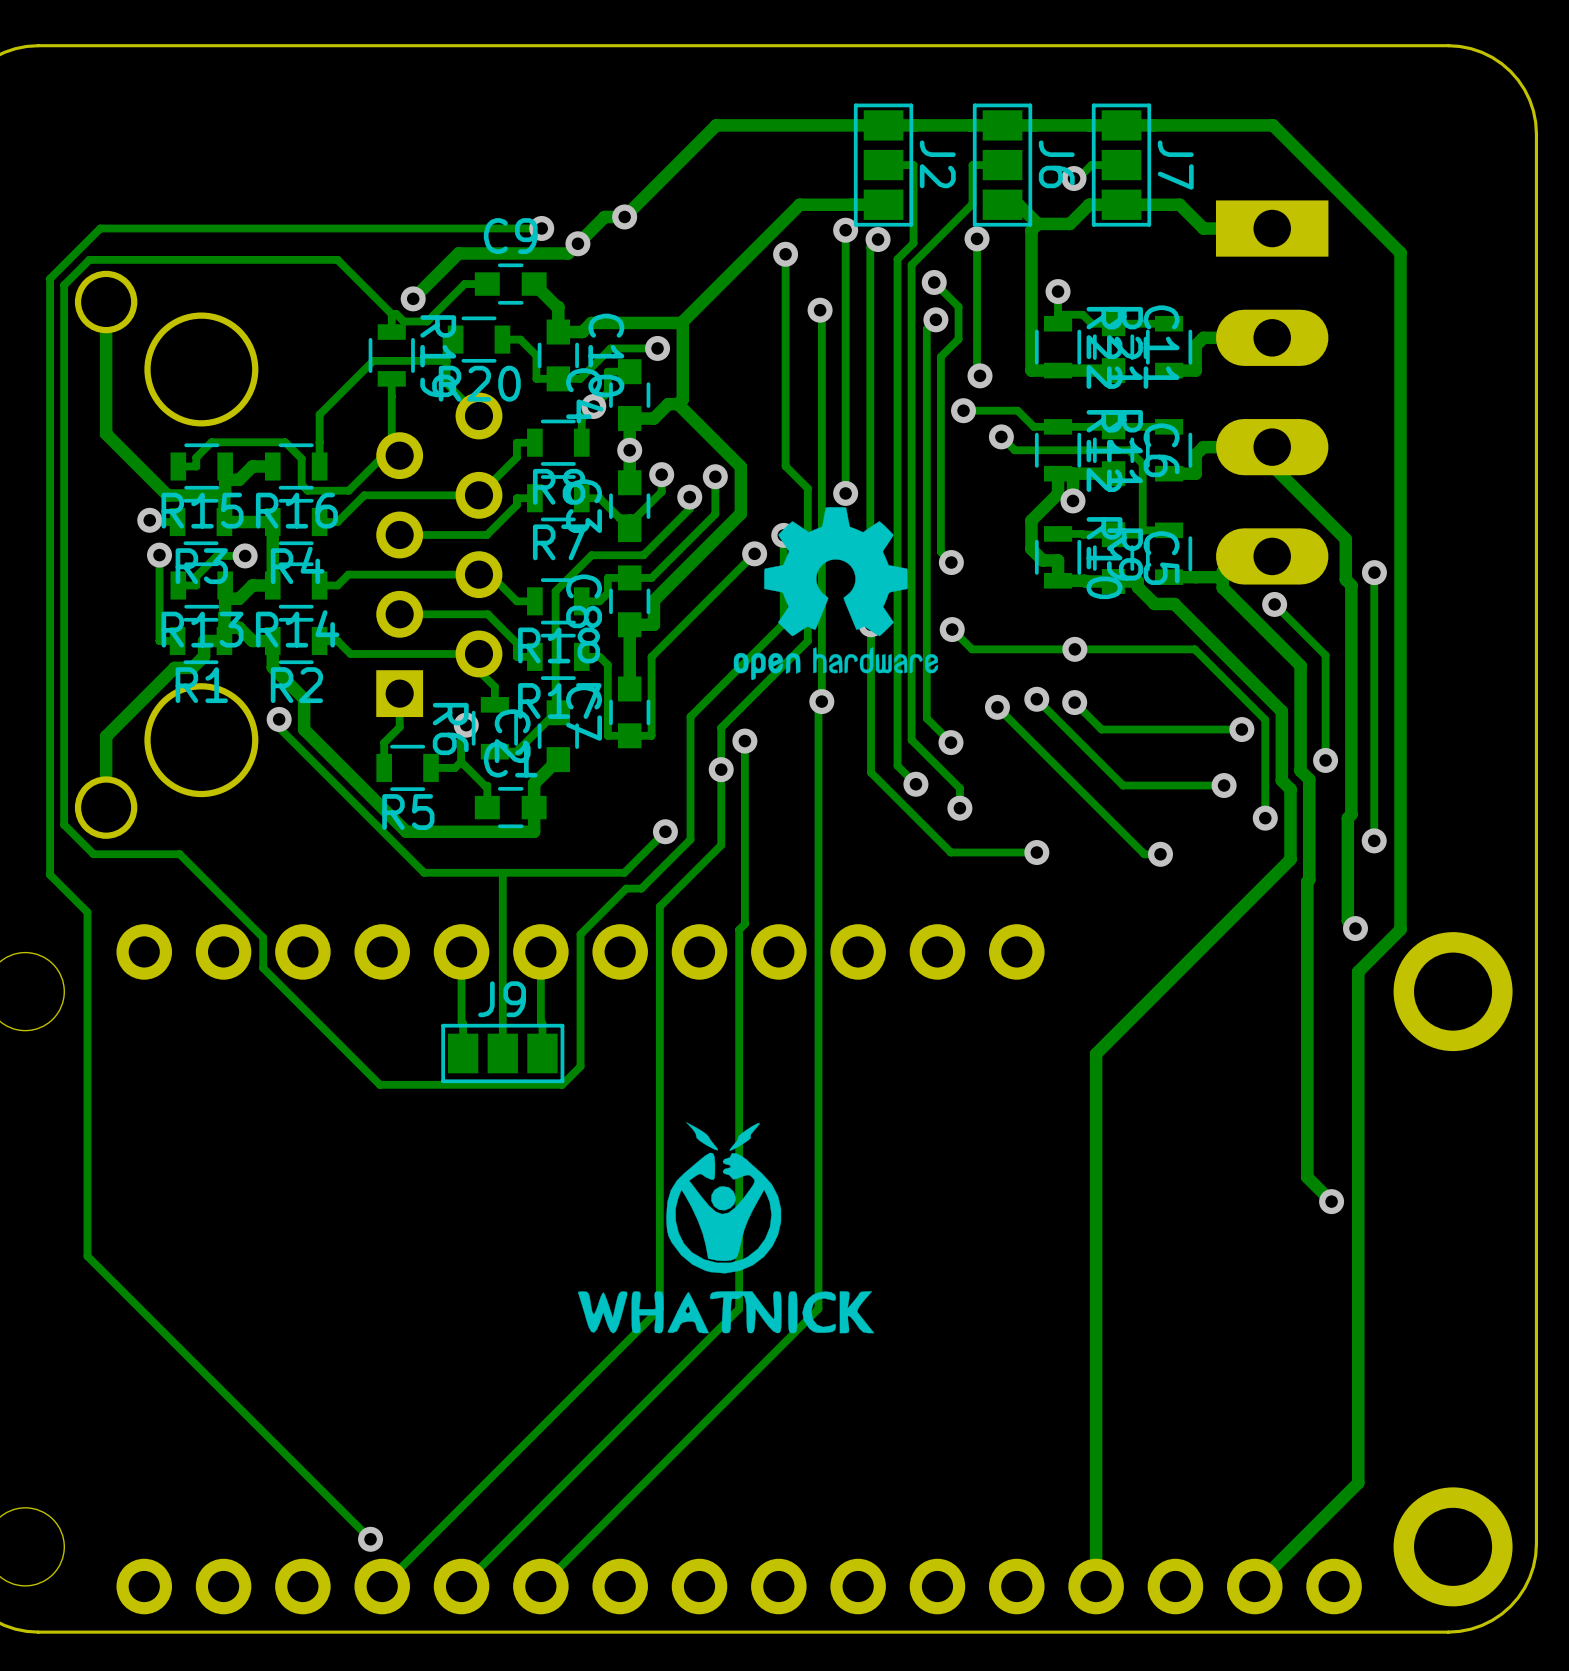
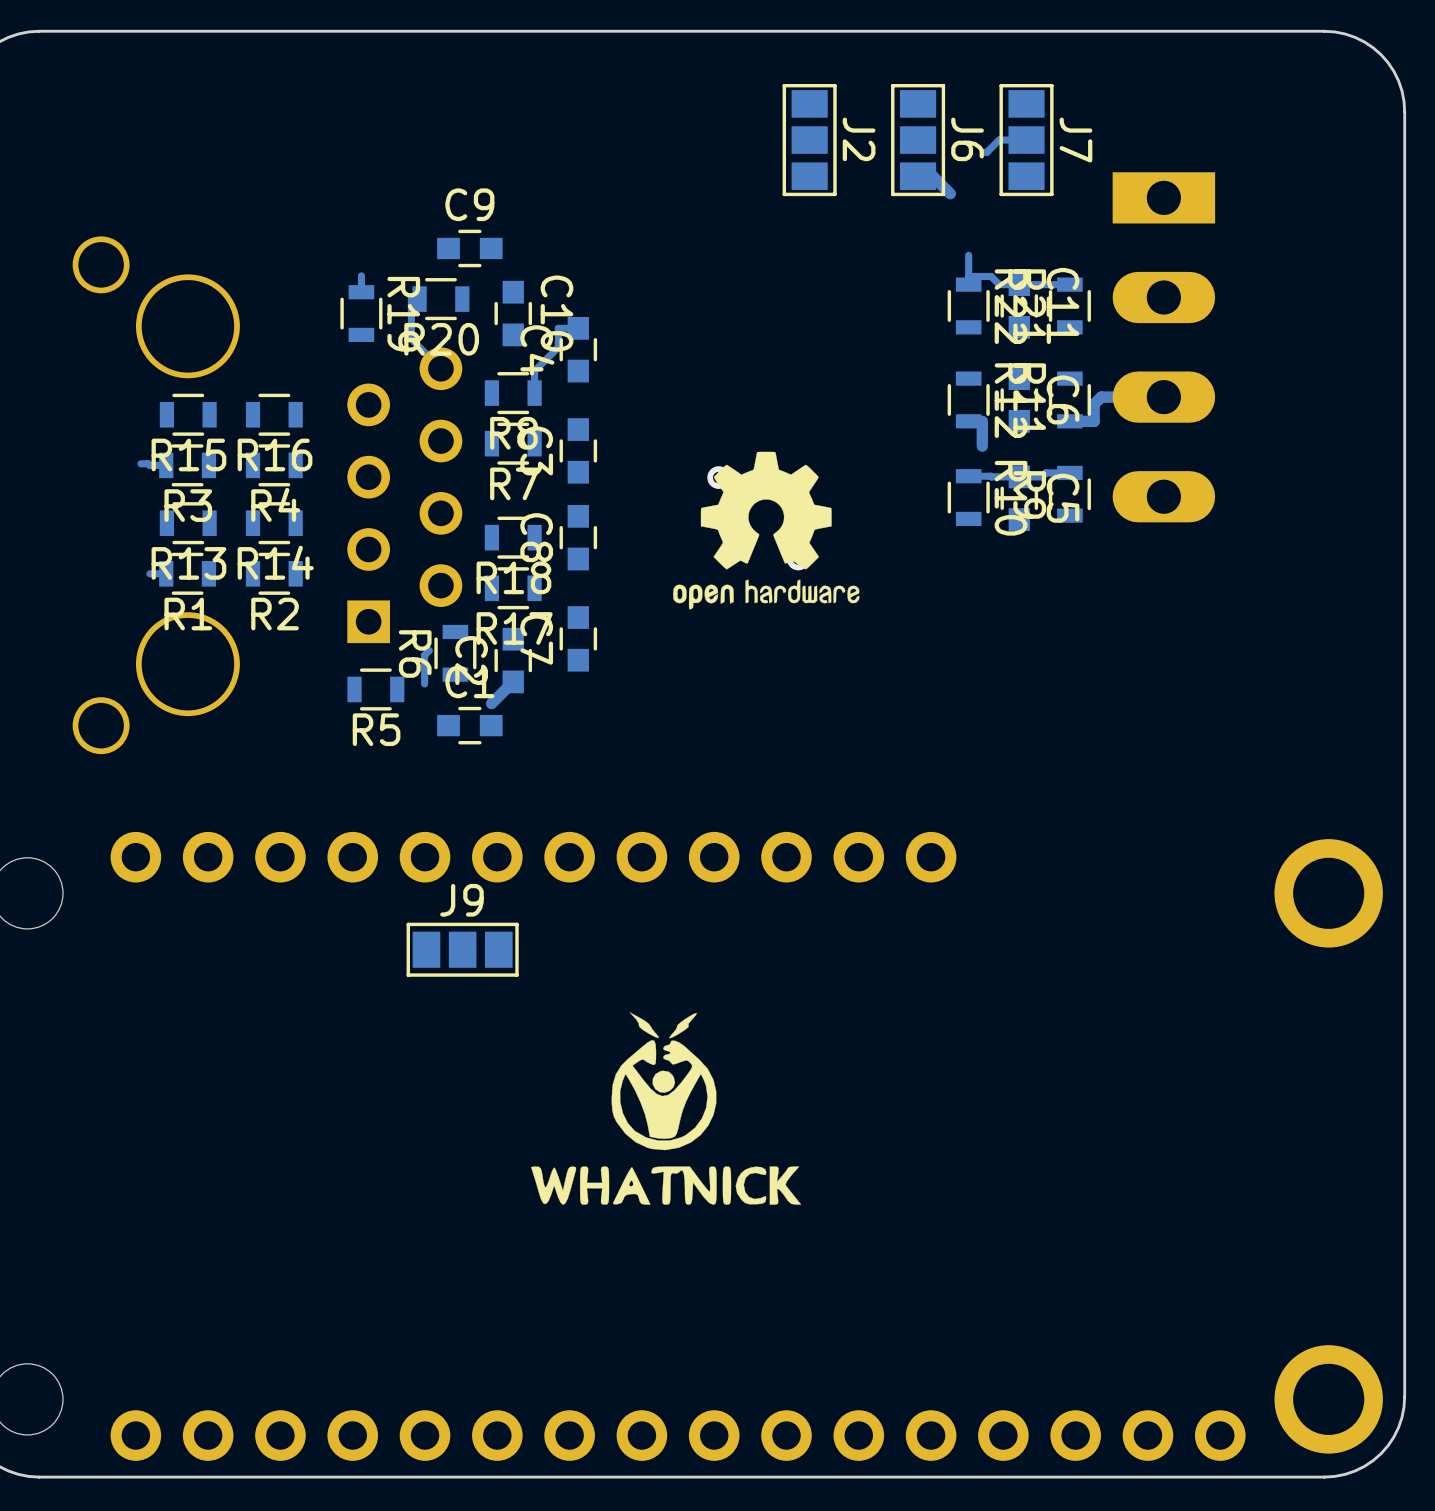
track: (883, 165) (913, 165) (913, 243) (897, 259) (897, 765) (915, 784) -> none
track: (1002, 165) (972, 165) (972, 204) (911, 264) (911, 740) (959, 788) (959, 808) -> none
via: (1074, 178) -> none
track: (883, 204) (799, 204) (682, 321) (682, 399) (678, 404) -> none
via: (624, 216) -> none
track: (541, 228) (100, 228) (50, 278) (50, 874) (87, 912) (87, 1256) (370, 1539) -> none
via: (541, 228) -> none
track: (1272, 228) (1203, 228) (1179, 204) (1089, 204) (1069, 223) (1037, 223) (1031, 230) (1031, 370) (1113, 370) -> none
track: (845, 230) (845, 493) -> none
via: (845, 230) -> none
track: (977, 238) (977, 372) (980, 375) -> none
via: (977, 238) -> none
track: (878, 239) (870, 247) (870, 572) -> none
via: (878, 239) -> none
via: (577, 243) -> none
track: (785, 254) (785, 466) (807, 488) (807, 641) (721, 727) (721, 845) (659, 906) (659, 1308) (382, 1586) -> none
via: (785, 254) -> none
track: (934, 282) (958, 306) (958, 339) (940, 356) (940, 552) (951, 562) -> none
via: (934, 282) -> none
track: (487, 284) (464, 284) (427, 321) (403, 321) (396, 314) (391, 314) (337, 259) (89, 259) (64, 285) (64, 824) (93, 854) (179, 854) (263, 937) (263, 968) (379, 1084) (562, 1084) (580, 1066) (580, 934) (626, 888) (641, 888) (690, 839) (690, 716) (783, 623) (783, 535) -> none
track: (534, 284) (558, 307) (558, 332) (582, 332) (591, 322) (682, 322) -> none
via: (1058, 291) -> none
track: (413, 298) (458, 253) (568, 253) (604, 216) (624, 216) (716, 125) (1273, 125) (1400, 252) (1400, 929) (1358, 971) (1358, 1483) (1254, 1586) -> none
via: (413, 298) -> none
track: (106, 302) (106, 433) (167, 495) (224, 495) -> none
track: (820, 310) (821, 311) (821, 701) (818, 704) (818, 1308) (540, 1586) -> none
via: (820, 310) -> none
track: (935, 319) (926, 328) (926, 718) (950, 742) -> none
via: (935, 319) -> none
track: (1272, 337) (1203, 337) (1195, 345) (1195, 370) (1169, 370) -> none
track: (502, 339) (520, 339) (536, 355) (536, 378) (580, 378) (610, 348) (657, 348) -> none
via: (657, 348) -> none
track: (446, 360) (373, 360) (319, 414) (319, 466) -> none
via: (980, 375) -> none
track: (391, 378) (391, 447) -> none
track: (678, 404) (668, 404) (653, 418) (629, 418) (629, 482) -> none
track: (678, 404) (740, 466) (740, 513) (653, 600) (653, 624) (629, 624) (629, 688) -> none
via: (593, 406) -> none
track: (963, 410) (1017, 410) (1033, 426) (1169, 426) -> none
via: (963, 410) -> none
track: (1001, 436) (1014, 450) (1129, 450) (1142, 463) (1142, 530) -> none
via: (1001, 436) -> none
track: (534, 442) (516, 442) (516, 457) (479, 495) (364, 495) (337, 522) (319, 522) -> none
track: (391, 447) (348, 490) (307, 490) (301, 484) (301, 458) (285, 442) (211, 442) (196, 457) (196, 466) (178, 466) -> none
track: (1253, 447) (1345, 539) (1345, 579) (1351, 585) (1351, 814) (1347, 818) (1347, 920) (1355, 928) -> none
via: (629, 450) -> none
track: (225, 466) (224, 522) (272, 522) (272, 585) (252, 585) (239, 598) (225, 598) -> none
track: (272, 466) (252, 466) (239, 479) (225, 479) -> none
track: (1113, 473) (1058, 473) (1058, 493) (1031, 520) (1031, 549) (1042, 560) (1058, 560) (1058, 580) (1137, 581) (1137, 587) (1154, 603) (1174, 603) (1281, 711) (1281, 780) (1290, 789) (1290, 859) (1096, 1053) (1096, 1586) -> none
track: (661, 474) (661, 491) (635, 518) (619, 518) (599, 498) (581, 498) -> none
via: (661, 474) -> none
track: (715, 476) (715, 514) (651, 577) (607, 577) (607, 593) (599, 601) (581, 601) -> none
via: (715, 476) -> none
via: (845, 493) -> none
track: (689, 497) (689, 508) (643, 555) (591, 555) (555, 591) (555, 712) -> none
via: (689, 497) -> none
track: (534, 498) (516, 498) (516, 504) (486, 534) (399, 534) -> none
via: (1072, 500) -> none
via: (149, 520) -> none
track: (754, 553) (651, 656) (651, 735) (607, 735) (607, 665) (599, 656) (581, 656) -> none
via: (754, 553) -> none
track: (159, 555) (159, 640) -> none
via: (159, 555) -> none
track: (245, 555) (216, 555) (196, 576) (196, 585) (178, 585) -> none
via: (245, 555) -> none
track: (1272, 556) (1237, 556) (1222, 571) (1222, 587) (1300, 665) (1300, 770) (1309, 779) (1307, 1177) (1331, 1201) -> none
via: (951, 562) -> none
track: (1374, 572) (1374, 840) -> none
via: (1374, 572) -> none
track: (1222, 577) (1169, 577) -> none
track: (225, 585) (224, 641) (204, 641) (204, 656) (192, 667) (174, 667) (106, 736) (106, 807) -> none
track: (319, 585) (337, 585) (348, 574) (490, 574) (516, 601) (534, 601) -> none
track: (1274, 604) (1325, 655) (1325, 760) -> none
via: (1274, 604) -> none
track: (399, 614) (487, 614) (516, 643) (516, 656) (534, 656) -> none
track: (871, 624) (871, 772) (950, 852) (1036, 852) -> none
track: (224, 627) (239, 627) (252, 641) (272, 641) (272, 667) (304, 698) (304, 729) (406, 831) (534, 831) (534, 783) -> none
track: (952, 629) (972, 649) (1194, 649) (1265, 719) (1265, 818) -> none
via: (952, 629) -> none
track: (319, 641) (337, 641) (350, 653) (479, 653) (479, 671) (494, 686) (494, 704) -> none
via: (1074, 649) -> none
track: (399, 693) (399, 727) (384, 742) (384, 767) -> none
track: (1036, 699) (1123, 785) (1224, 785) -> none
via: (1036, 699) -> none
via: (821, 701) -> none
track: (1074, 702) (1101, 729) (1241, 729) -> none
via: (1074, 702) -> none
track: (997, 707) (1144, 854) (1160, 854) -> none
via: (997, 707) -> none
track: (555, 712) (519, 749) (519, 751) (494, 751) -> none
track: (279, 719) (279, 727) (424, 872) (624, 872) (665, 831) -> none
via: (279, 719) -> none
via: (466, 725) -> none
via: (1241, 729) -> none
track: (744, 741) (744, 924) (739, 929) (739, 1308) (461, 1586) -> none
via: (744, 741) -> none
via: (950, 742) -> none
via: (1325, 760) -> none
track: (431, 767) (455, 767) (461, 761) (484, 785) (487, 785) (487, 807) -> none
via: (721, 769) -> none
via: (915, 784) -> none
via: (1224, 785) -> none
via: (959, 808) -> none
via: (1265, 818) -> none
via: (665, 831) -> none
via: (1374, 840) -> none
via: (1036, 852) -> none
via: (1160, 854) -> none
track: (502, 872) (502, 1053) -> none
via: (1355, 928) -> none
track: (461, 951) (463, 1053) -> none
track: (540, 951) (542, 1053) -> none
via: (1331, 1201) -> none
via: (370, 1539) -> none

